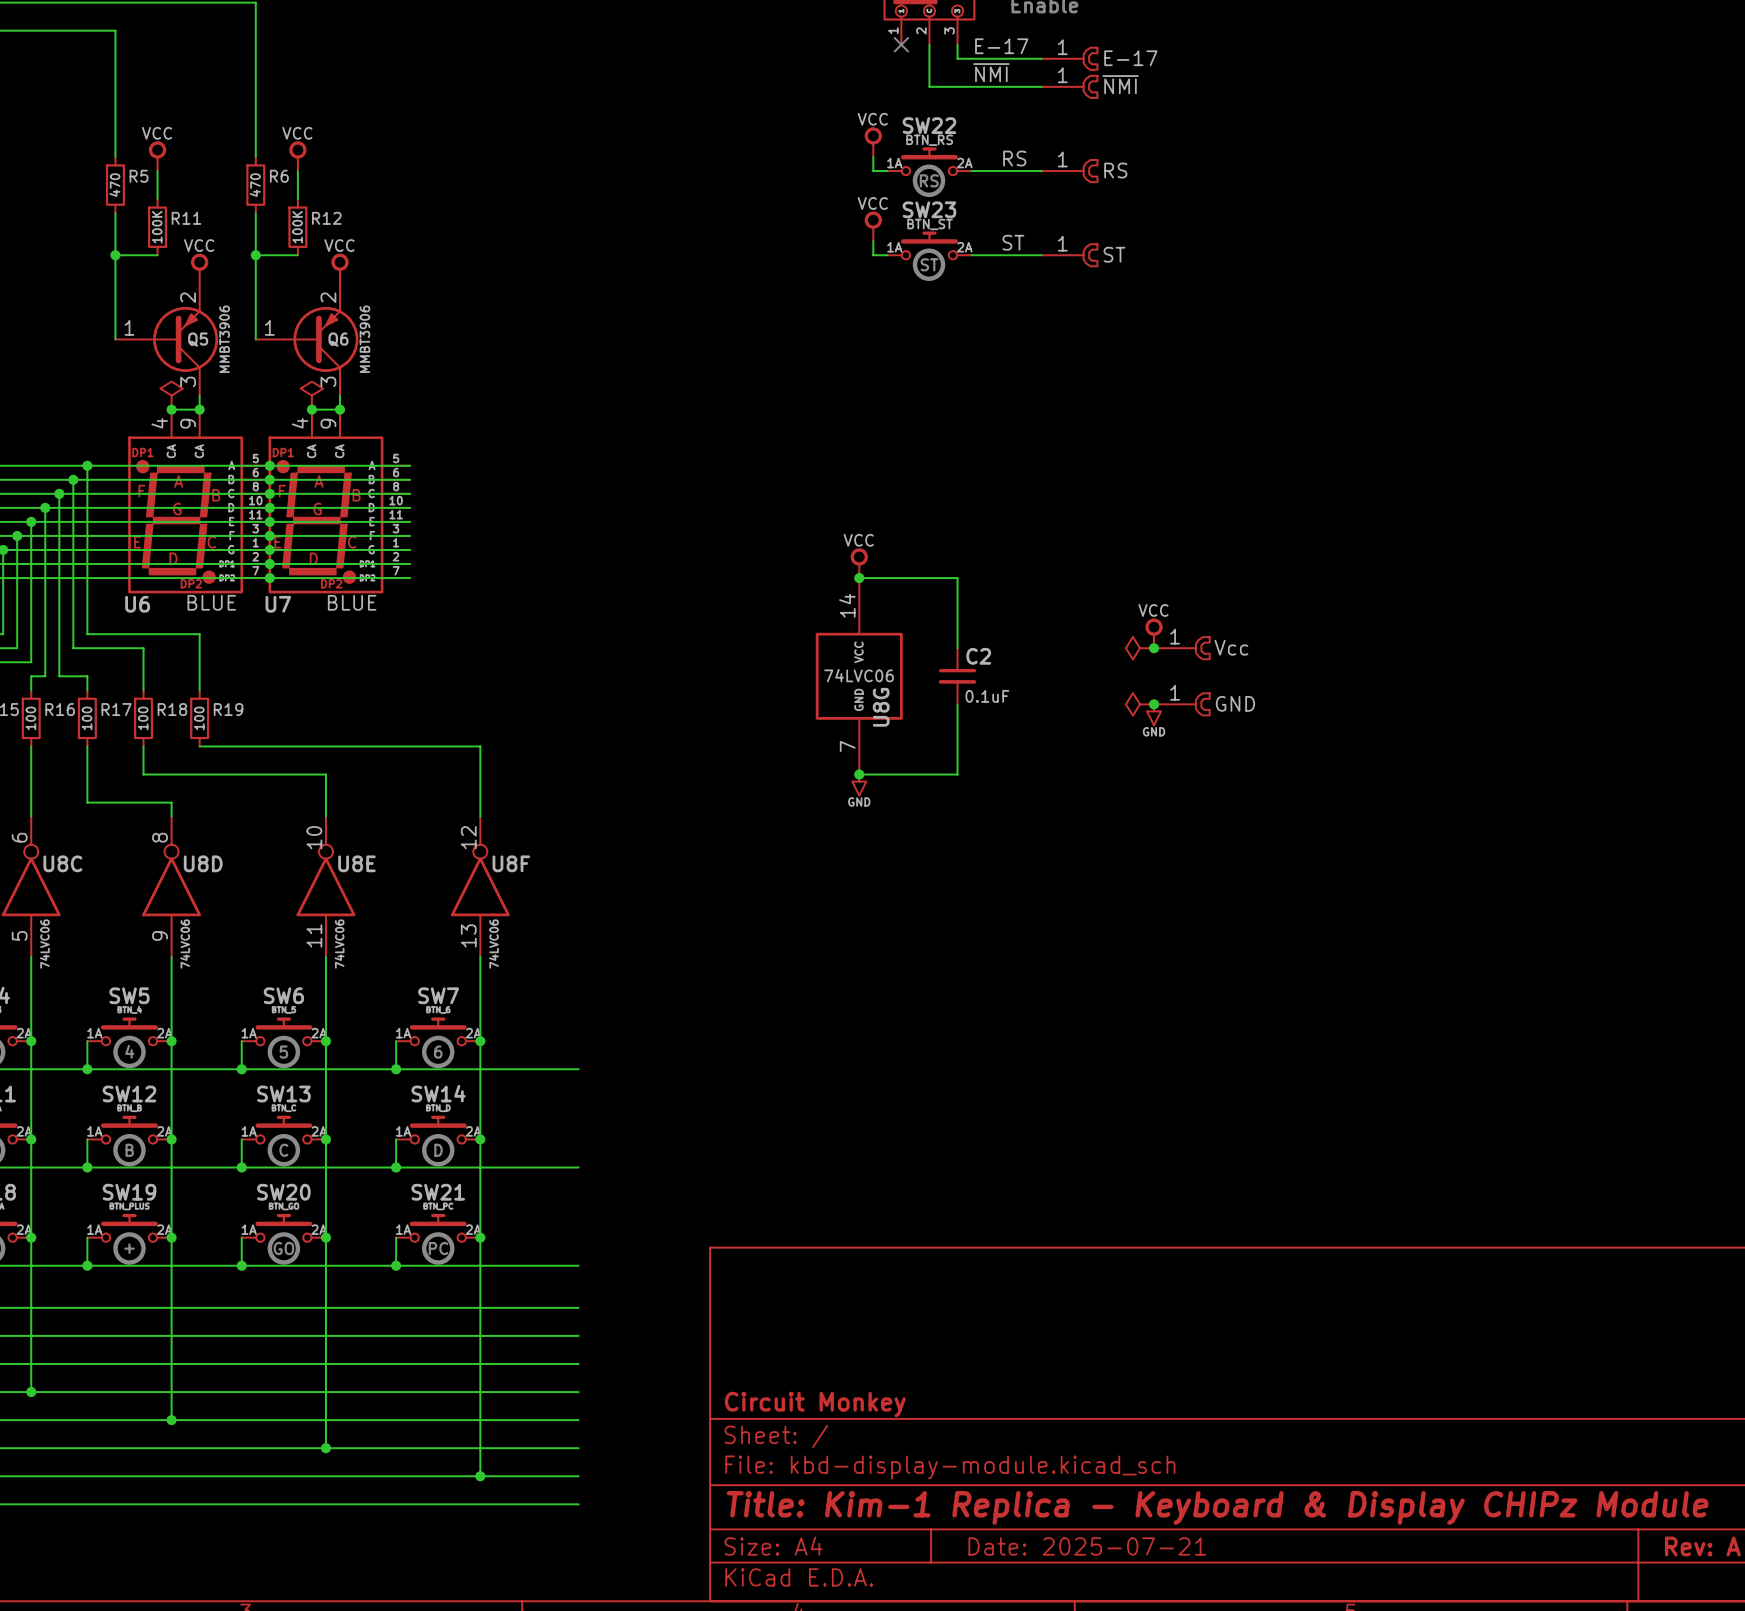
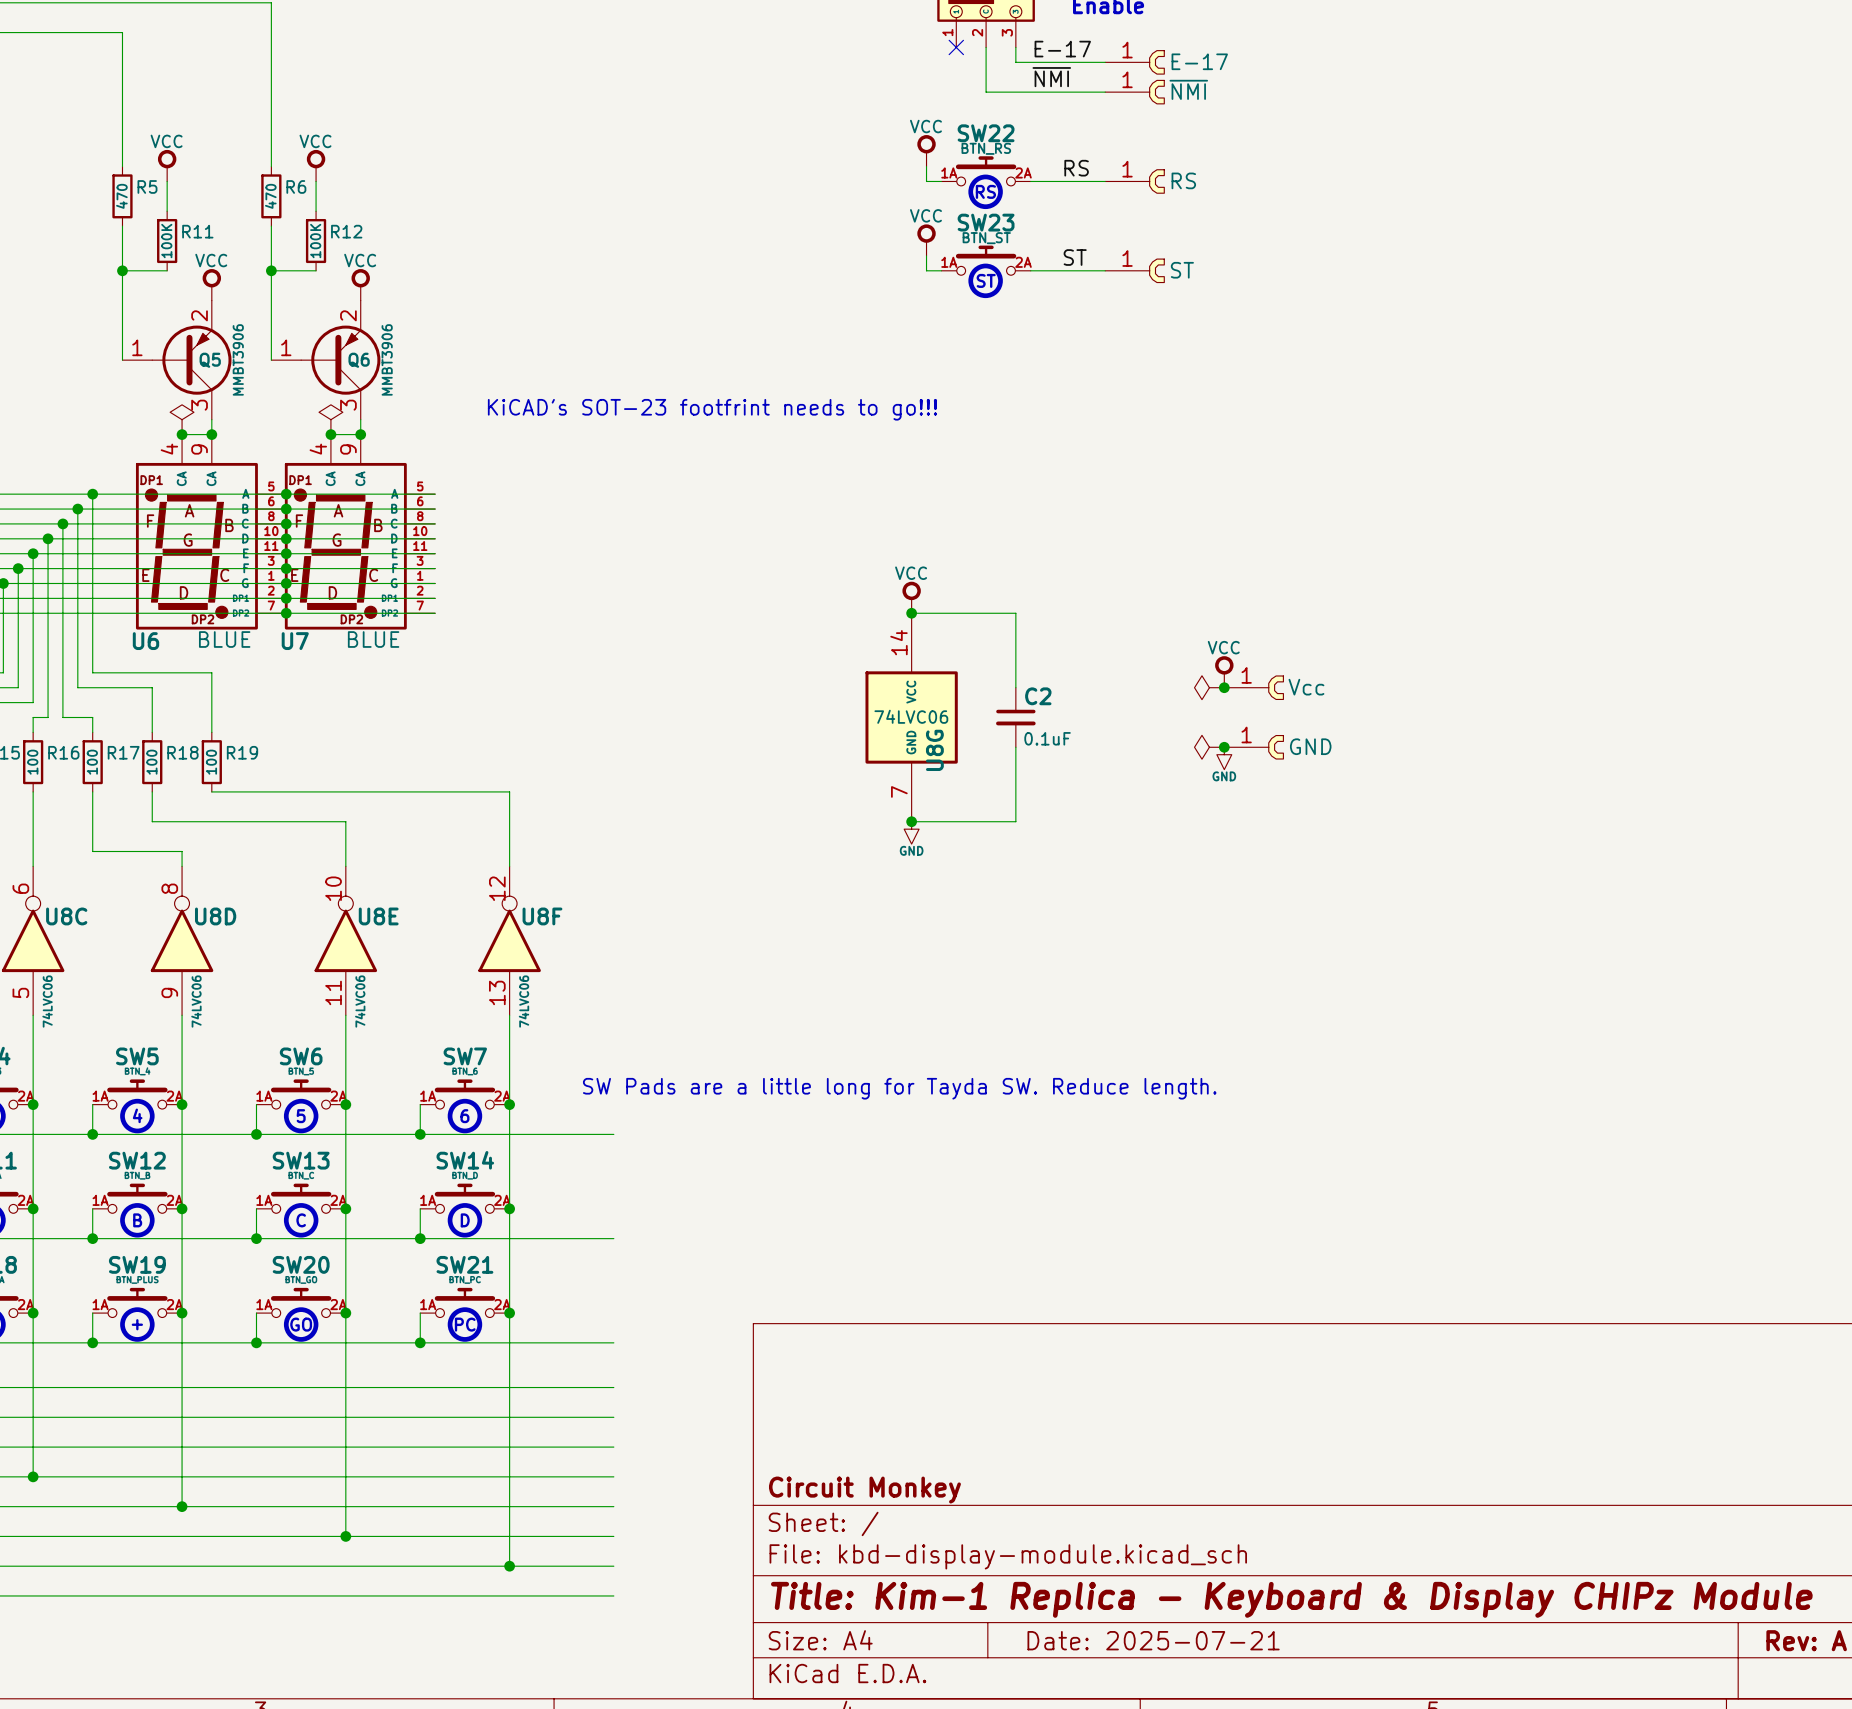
text: none -> KiCAD's SOT-23 footfrint needs to go!!! (712, 409)
text: none -> SW Pads are a little long for Tayda SW. Reduce length. (899, 1088)

